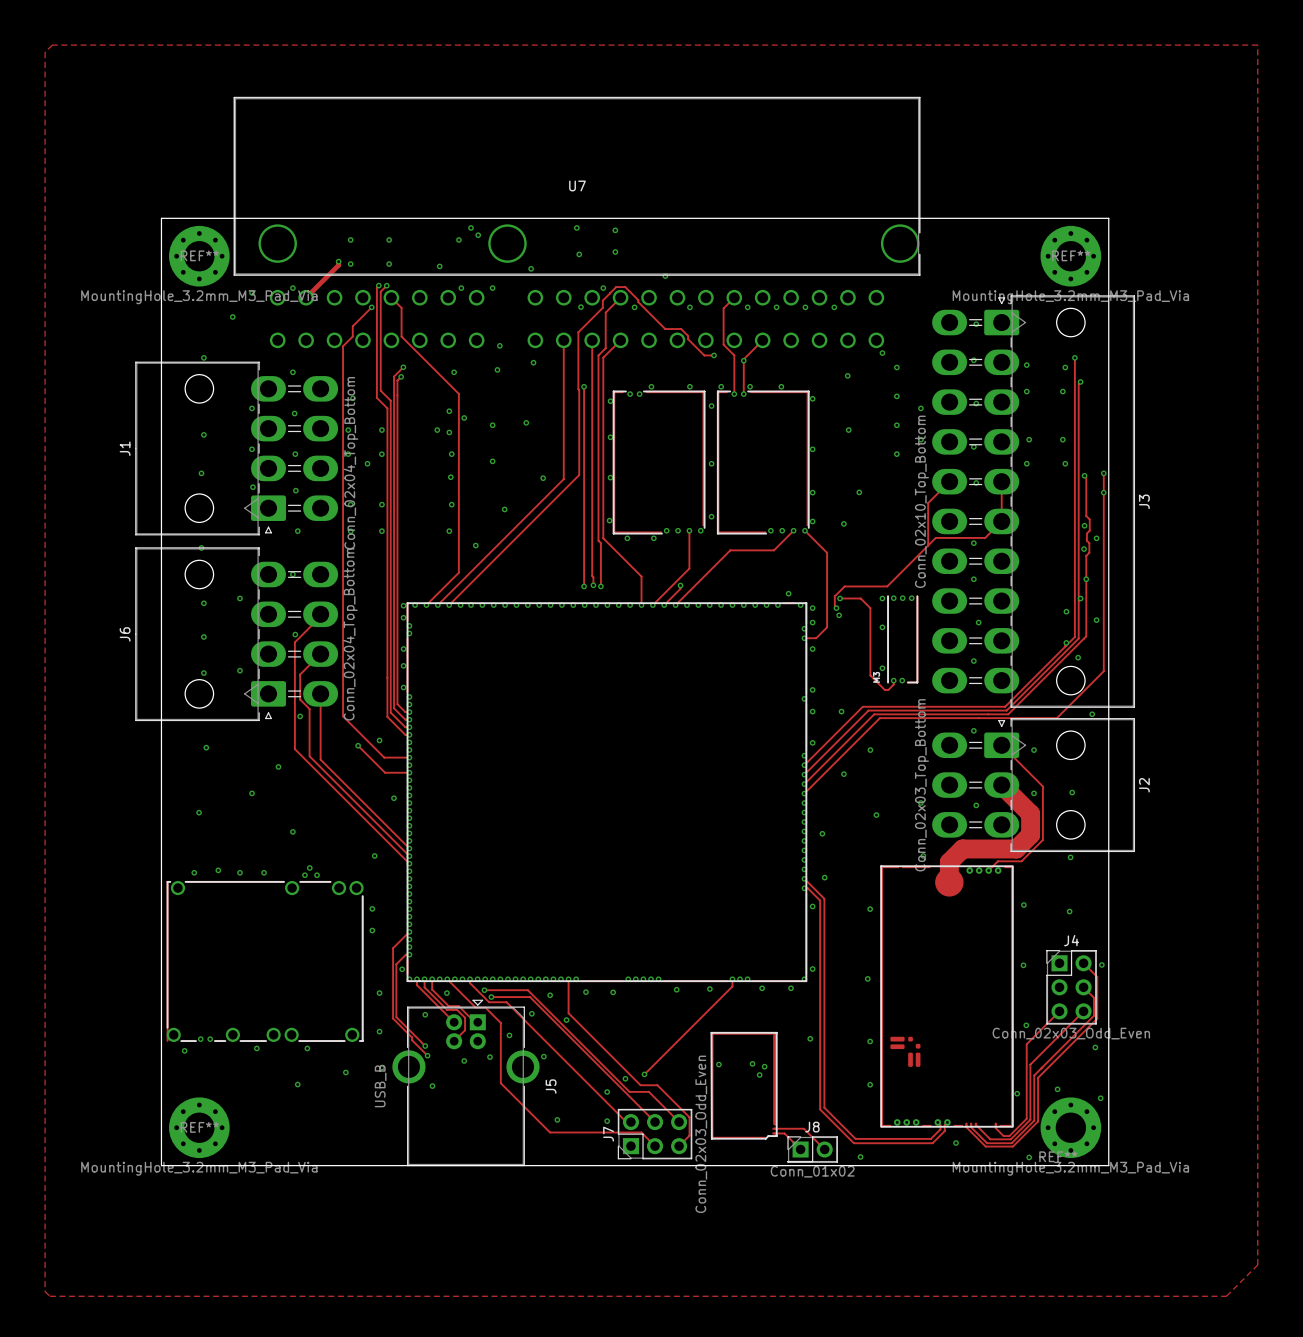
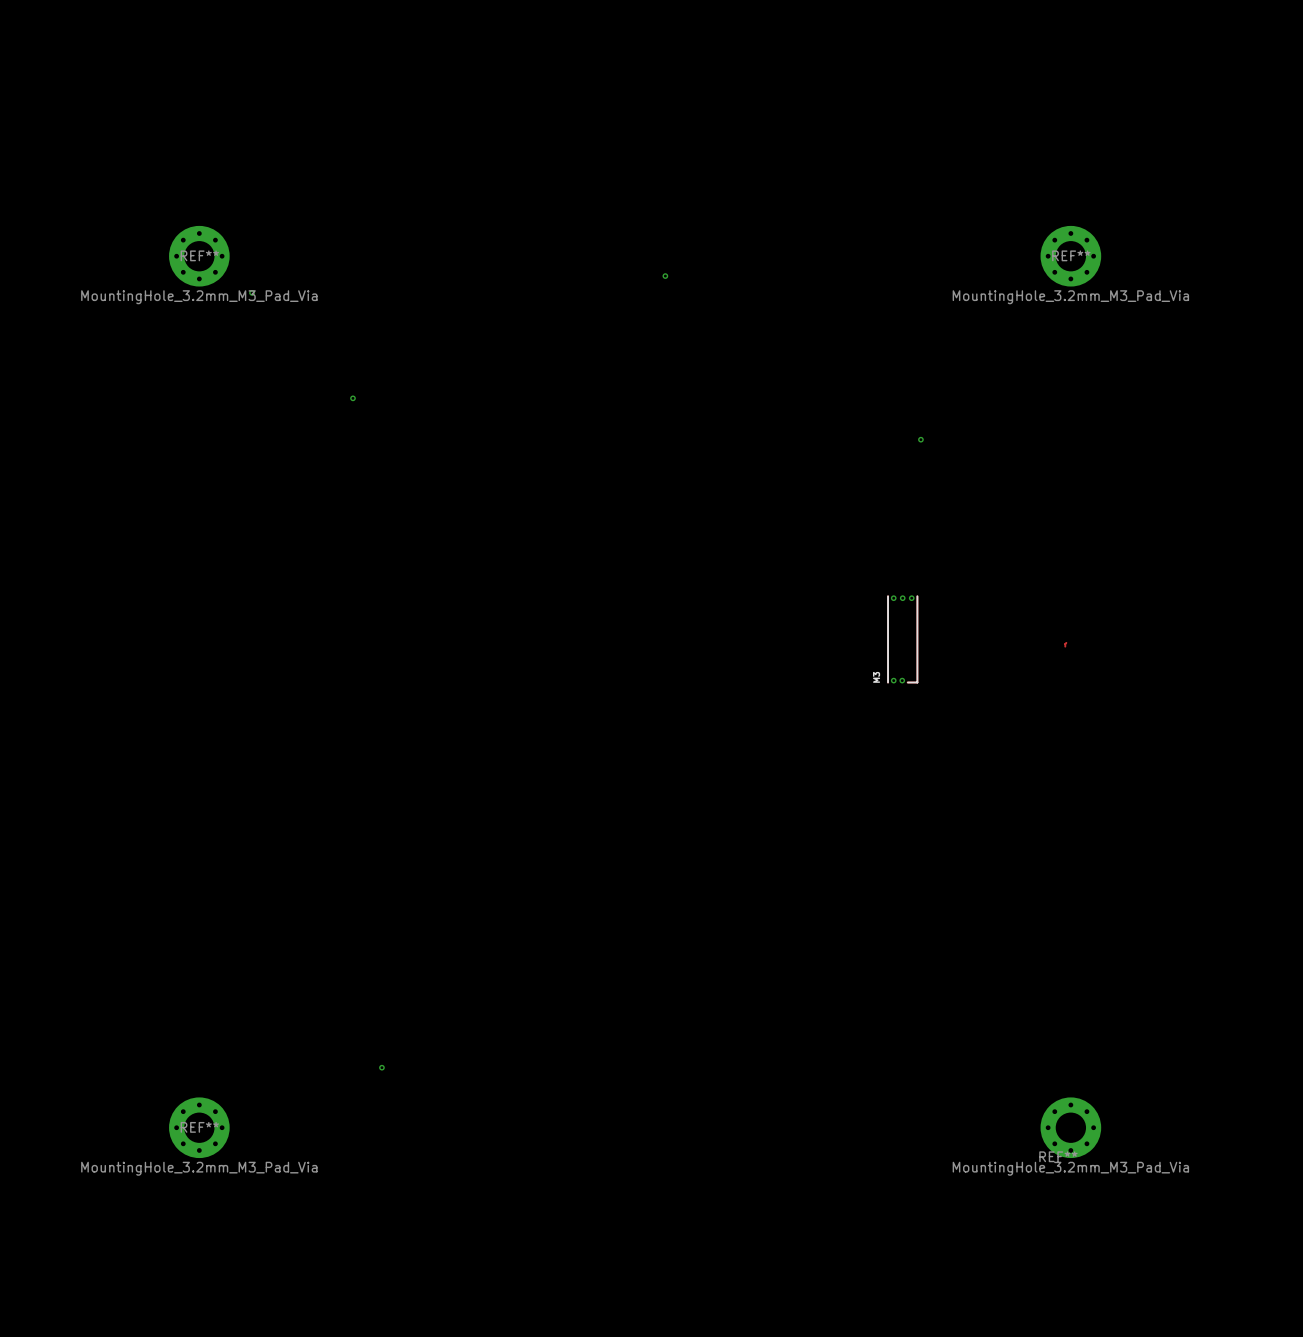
zone outline: (52, 45) (1257, 45) (1257, 1265) (1226, 1296) (49, 1296) (45, 1291) (45, 52) (52, 45) -> none
board edge: (161, 218) (1108, 218) (1108, 1165) (161, 1165) (161, 218) -> none
U7: (577, 222) -> none
via: (470, 227) -> none
via: (576, 227) -> none
via: (615, 230) -> none
via: (478, 235) -> none
via: (350, 239) -> none
via: (389, 239) -> none
via: (458, 239) -> none
via: (615, 252) -> none
via: (579, 254) -> none
track: (338, 261) (338, 265) (306, 297) -> none
via: (338, 261) -> none
via: (350, 264) -> none
via: (389, 264) -> none
via: (439, 266) -> none
via: (531, 268) -> none
track: (378, 285) (376, 287) (376, 397) (387, 408) (387, 716) (405, 734) (409, 734) -> none
via: (378, 285) -> none
track: (386, 285) (380, 291) (380, 390) (390, 400) (390, 712) (405, 727) (409, 727) -> none
via: (386, 285) -> none
via: (292, 288) -> none
via: (461, 288) -> none
via: (492, 288) -> none
via: (603, 288) -> none
track: (609, 293) (616, 287) (625, 287) (665, 329) (681, 329) (688, 335) (688, 339) (704, 355) (713, 355) -> none
track: (609, 293) (602, 300) (602, 307) (578, 332) (579, 475) (449, 605) -> none
track: (391, 297) (401, 307) (401, 336) (458, 393) (458, 572) (426, 605) -> none
track: (620, 297) (605, 312) (605, 348) (598, 355) (598, 540) (600, 543) (600, 586) -> none
track: (734, 297) (723, 308) (723, 344) (734, 355) (734, 394) -> none
track: (371, 307) (352, 326) (352, 336) (343, 346) (343, 716) (384, 757) (409, 757) -> none
via: (371, 307) -> none
via: (580, 307) -> none
via: (634, 307) -> none
via: (689, 307) -> none
via: (747, 307) -> none
via: (776, 307) -> none
via: (805, 307) -> none
via: (834, 307) -> none
via: (232, 316) -> none
via: (976, 324) -> none
track: (563, 340) (563, 479) (437, 605) -> none
track: (592, 340) (593, 585) -> none
track: (620, 340) (603, 357) (603, 538) (641, 576) (641, 605) -> none
track: (762, 340) (743, 359) (743, 394) -> none
via: (499, 345) -> none
via: (882, 353) -> none
via: (713, 355) -> none
via: (203, 357) -> none
track: (1074, 357) (1074, 636) (1005, 706) (862, 706) (804, 765) -> none
via: (1074, 357) -> none
via: (743, 360) -> none
via: (973, 360) -> none
via: (533, 362) -> none
via: (1026, 365) -> none
track: (403, 367) (394, 376) (394, 708) (405, 719) (409, 719) -> none
via: (403, 367) -> none
via: (896, 367) -> none
via: (1065, 367) -> none
via: (497, 369) -> none
via: (292, 372) -> none
via: (454, 372) -> none
via: (847, 375) -> none
track: (401, 376) (397, 380) (397, 704) (405, 712) (409, 712) -> none
via: (401, 376) -> none
track: (1080, 381) (1078, 383) (1078, 638) (1006, 710) (868, 710) (804, 774) -> none
via: (1080, 381) -> none
track: (584, 386) (584, 586) -> none
via: (584, 386) -> none
via: (651, 386) -> none
via: (689, 386) -> none
via: (721, 386) -> none
via: (750, 386) -> none
via: (781, 386) -> none
via: (1026, 391) -> none
via: (1062, 391) -> none
via: (896, 396) -> none
via: (812, 398) -> none
via: (610, 401) -> none
via: (976, 403) -> none
via: (711, 406) -> none
via: (252, 408) -> none
via: (920, 408) -> none
via: (449, 411) -> none
via: (294, 413) -> none
via: (464, 417) -> none
via: (526, 422) -> none
via: (492, 425) -> none
via: (896, 425) -> none
via: (348, 430) -> none
via: (381, 430) -> none
via: (437, 430) -> none
via: (848, 430) -> none
via: (449, 432) -> none
via: (203, 434) -> none
via: (610, 437) -> none
via: (1029, 439) -> none
via: (1062, 439) -> none
via: (973, 446) -> none
J1: Conn_02x04_Top_Bottom (236, 448) -> none
via: (252, 449) -> none
via: (812, 449) -> none
via: (295, 454) -> none
via: (348, 454) -> none
via: (381, 454) -> none
via: (451, 454) -> none
via: (896, 454) -> none
via: (492, 461) -> none
part: (659, 462) -> none
part: (763, 462) -> none
via: (367, 463) -> none
via: (711, 463) -> none
via: (1026, 463) -> none
via: (1065, 463) -> none
via: (201, 473) -> none
track: (1103, 473) (1103, 671) (1056, 718) (879, 718) (804, 793) -> none
via: (1103, 473) -> none
track: (1084, 475) (1086, 477) (1086, 516) (1089, 519) (1089, 530) (1086, 533) (1089, 552) (1086, 555) (1086, 636) (1008, 714) (874, 714) (804, 784) -> none
via: (1084, 475) -> none
via: (450, 477) -> none
via: (610, 477) -> none
via: (543, 478) -> none
track: (949, 481) (928, 503) (928, 545) -> none
track: (1001, 481) (1001, 521) (985, 537) (935, 537) (887, 586) (844, 586) (834, 596) (836, 608) -> none
via: (976, 483) -> none
via: (252, 487) -> none
via: (295, 490) -> none
via: (812, 492) -> none
via: (859, 492) -> none
via: (1103, 492) -> none
J3: Conn_02x10_Top_Bottom (1033, 501) -> none
via: (350, 504) -> none
via: (381, 504) -> none
via: (451, 504) -> none
via: (504, 509) -> none
via: (711, 516) -> none
via: (609, 520) -> none
via: (812, 521) -> none
via: (843, 523) -> none
via: (1084, 525) -> none
track: (689, 530) (689, 568) (652, 605) -> none
track: (793, 530) (773, 550) (730, 550) (675, 605) -> none
track: (804, 530) (827, 552) (827, 627) (816, 638) (804, 638) -> none
via: (297, 531) -> none
via: (350, 531) -> none
via: (381, 531) -> none
via: (449, 531) -> none
via: (627, 538) -> none
via: (653, 538) -> none
via: (1096, 538) -> none
via: (973, 543) -> none
via: (475, 545) -> none
via: (201, 547) -> none
via: (1084, 549) -> none
via: (292, 574) -> none
via: (973, 579) -> none
via: (1086, 579) -> none
via: (593, 585) -> none
track: (680, 585) (680, 588) (664, 605) -> none
via: (680, 585) -> none
via: (584, 586) -> none
via: (600, 586) -> none
via: (788, 593) -> none
via: (239, 598) -> none
track: (840, 598) (860, 598) (870, 608) (870, 675) (884, 689) (888, 689) (893, 684) (893, 680) -> none
via: (840, 598) -> none
via: (882, 598) -> none
via: (1080, 598) -> none
via: (203, 603) -> none
via: (403, 605) -> none
via: (812, 608) -> none
via: (836, 608) -> none
via: (1066, 611) -> none
track: (320, 614) (320, 616) (294, 642) (294, 749) (409, 863) -> none
via: (839, 615) -> none
via: (403, 617) -> none
via: (1096, 620) -> none
via: (812, 622) -> none
via: (978, 622) -> none
via: (882, 627) -> none
J6: Conn_02x04_Top_Bottom (236, 634) -> none
via: (295, 634) -> none
via: (203, 636) -> none
via: (1066, 642) -> none
via: (403, 649) -> none
via: (812, 649) -> none
track: (320, 654) (300, 674) (300, 699) (309, 709) (309, 756) (409, 856) -> none
via: (1078, 657) -> none
via: (973, 661) -> none
via: (403, 665) -> none
via: (882, 668) -> none
via: (239, 670) -> none
via: (203, 673) -> none
via: (403, 687) -> none
via: (812, 689) -> none
track: (320, 693) (320, 759) (409, 848) -> none
via: (812, 711) -> none
via: (841, 711) -> none
via: (1092, 714) -> none
via: (300, 716) -> none
via: (973, 730) -> none
via: (379, 740) -> none
via: (812, 742) -> none
track: (358, 745) (385, 772) (409, 772) -> none
via: (358, 745) -> none
track: (1001, 745) (1042, 786) (1042, 839) (1021, 861) (997, 861) (988, 870) -> none
via: (206, 747) -> none
via: (870, 750) -> none
via: (1034, 750) -> none
via: (278, 766) -> none
via: (843, 774) -> none
track: (1001, 785) (1030, 813) (1030, 834) (1016, 849) (962, 849) (949, 862) (949, 882) -> none
J2: Conn_02x03_Top_Bottom (1033, 785) -> none
part: (606, 792) -> none
via: (1072, 792) -> none
via: (252, 793) -> none
via: (1034, 793) -> none
via: (393, 798) -> none
via: (920, 803) -> none
via: (976, 805) -> none
via: (199, 812) -> none
via: (876, 815) -> none
via: (292, 831) -> none
via: (822, 833) -> none
via: (374, 855) -> none
via: (923, 855) -> none
via: (1070, 857) -> none
via: (309, 867) -> none
via: (218, 870) -> none
via: (194, 872) -> none
via: (239, 872) -> none
via: (264, 872) -> none
via: (304, 875) -> none
via: (316, 875) -> none
via: (824, 877) -> none
track: (804, 878) (824, 898) (824, 1107) (855, 1138) (930, 1138) (940, 1129) (940, 1125) (937, 1122) -> none
track: (804, 888) (807, 888) (820, 900) (820, 1109) (853, 1143) (932, 1143) (944, 1131) (944, 1125) (947, 1122) -> none
via: (1023, 905) -> none
via: (812, 906) -> none
via: (372, 908) -> none
via: (870, 909) -> none
via: (1069, 911) -> none
via: (372, 930) -> none
track: (409, 931) (393, 948) (393, 1018) (427, 1055) -> none
track: (409, 954) (405, 954) (396, 964) (396, 1017) (425, 1046) -> none
part: (265, 961) -> none
track: (1083, 963) (1097, 977) (1097, 1018) (1038, 1077) (1038, 1121) (1013, 1146) (985, 1146) (966, 1127) (966, 1124) -> none
via: (1101, 964) -> none
via: (1023, 965) -> none
via: (402, 969) -> none
via: (812, 969) -> none
via: (867, 978) -> none
track: (417, 979) (417, 985) (454, 1022) -> none
track: (424, 979) (424, 987) (447, 1009) (457, 1009) (465, 1017) (465, 1030) (454, 1041) -> none
track: (432, 979) (432, 989) (448, 1006) (458, 1006) (474, 1022) (477, 1022) -> none
track: (447, 979) (475, 1007) (485, 1007) (500, 1022) (500, 1083) (550, 1132) (641, 1132) (655, 1146) -> none
track: (470, 979) (470, 983) (489, 1002) (506, 1002) (626, 1122) (630, 1122) -> none
track: (568, 979) (568, 1013) (640, 1085) (657, 1085) (689, 1117) (689, 1135) (679, 1146) -> none
track: (732, 979) (732, 986) (644, 1074) -> none
J4: Conn_02x03_Odd_Even (1071, 987) -> none
track: (1083, 987) (1093, 997) (1093, 1015) (1034, 1075) (1034, 1120) (1011, 1143) (987, 1143) (971, 1127) (971, 1124) -> none
via: (762, 988) -> none
via: (790, 988) -> none
via: (676, 989) -> none
via: (709, 989) -> none
track: (484, 990) (527, 990) (629, 1091) (648, 1091) (679, 1122) -> none
via: (484, 990) -> none
via: (585, 992) -> none
via: (613, 992) -> none
via: (379, 993) -> none
via: (446, 993) -> none
via: (550, 995) -> none
part: (946, 996) -> none
track: (491, 997) (530, 997) (655, 1122) -> none
via: (491, 997) -> none
track: (1059, 1011) (1026, 1044) (1026, 1118) (1009, 1136) (1003, 1136) (995, 1128) (995, 1124) -> none
track: (1083, 1011) (1030, 1064) (1030, 1119) (1010, 1139) (990, 1139) (975, 1124) -> none
via: (531, 1013) -> none
via: (425, 1014) -> none
via: (566, 1020) -> none
via: (1026, 1025) -> none
via: (379, 1031) -> none
via: (509, 1035) -> none
via: (810, 1038) -> none
via: (870, 1041) -> none
via: (425, 1046) -> none
via: (1095, 1047) -> none
via: (256, 1048) -> none
via: (307, 1048) -> none
via: (184, 1050) -> none
via: (427, 1055) -> none
via: (543, 1056) -> none
via: (489, 1057) -> none
via: (464, 1060) -> none
via: (345, 1072) -> none
via: (644, 1074) -> none
via: (625, 1078) -> none
J5: USB_B (465, 1082) -> none
via: (297, 1084) -> none
via: (870, 1084) -> none
part: (744, 1085) -> none
via: (432, 1086) -> none
via: (1057, 1089) -> none
via: (607, 1091) -> none
via: (1017, 1093) -> none
via: (1100, 1098) -> none
via: (557, 1119) -> none
via: (607, 1121) -> none
track: (774, 1128) (803, 1128) (824, 1149) -> none
track: (774, 1133) (784, 1133) (800, 1149) -> none
J7: Conn_02x03_Odd_Even (655, 1134) -> none
via: (956, 1143) -> none
J8: Conn_01x02 (812, 1149) -> none
via: (860, 1156) -> none
via: (1029, 1157) -> none

